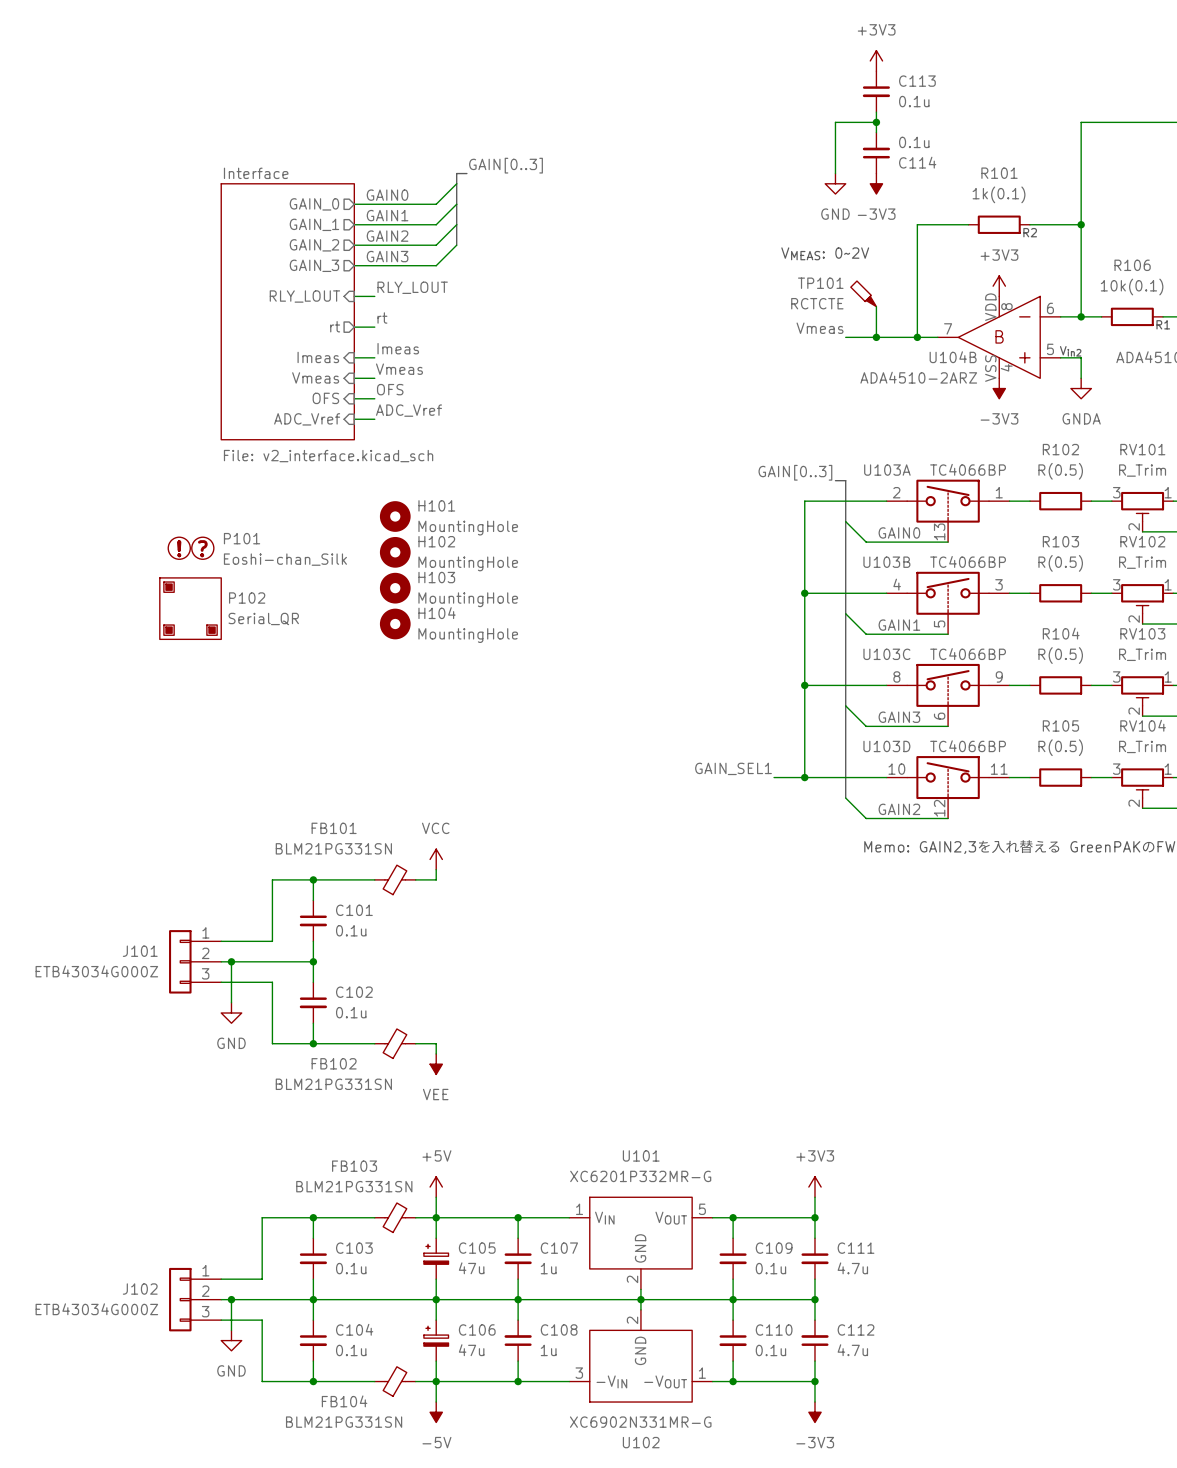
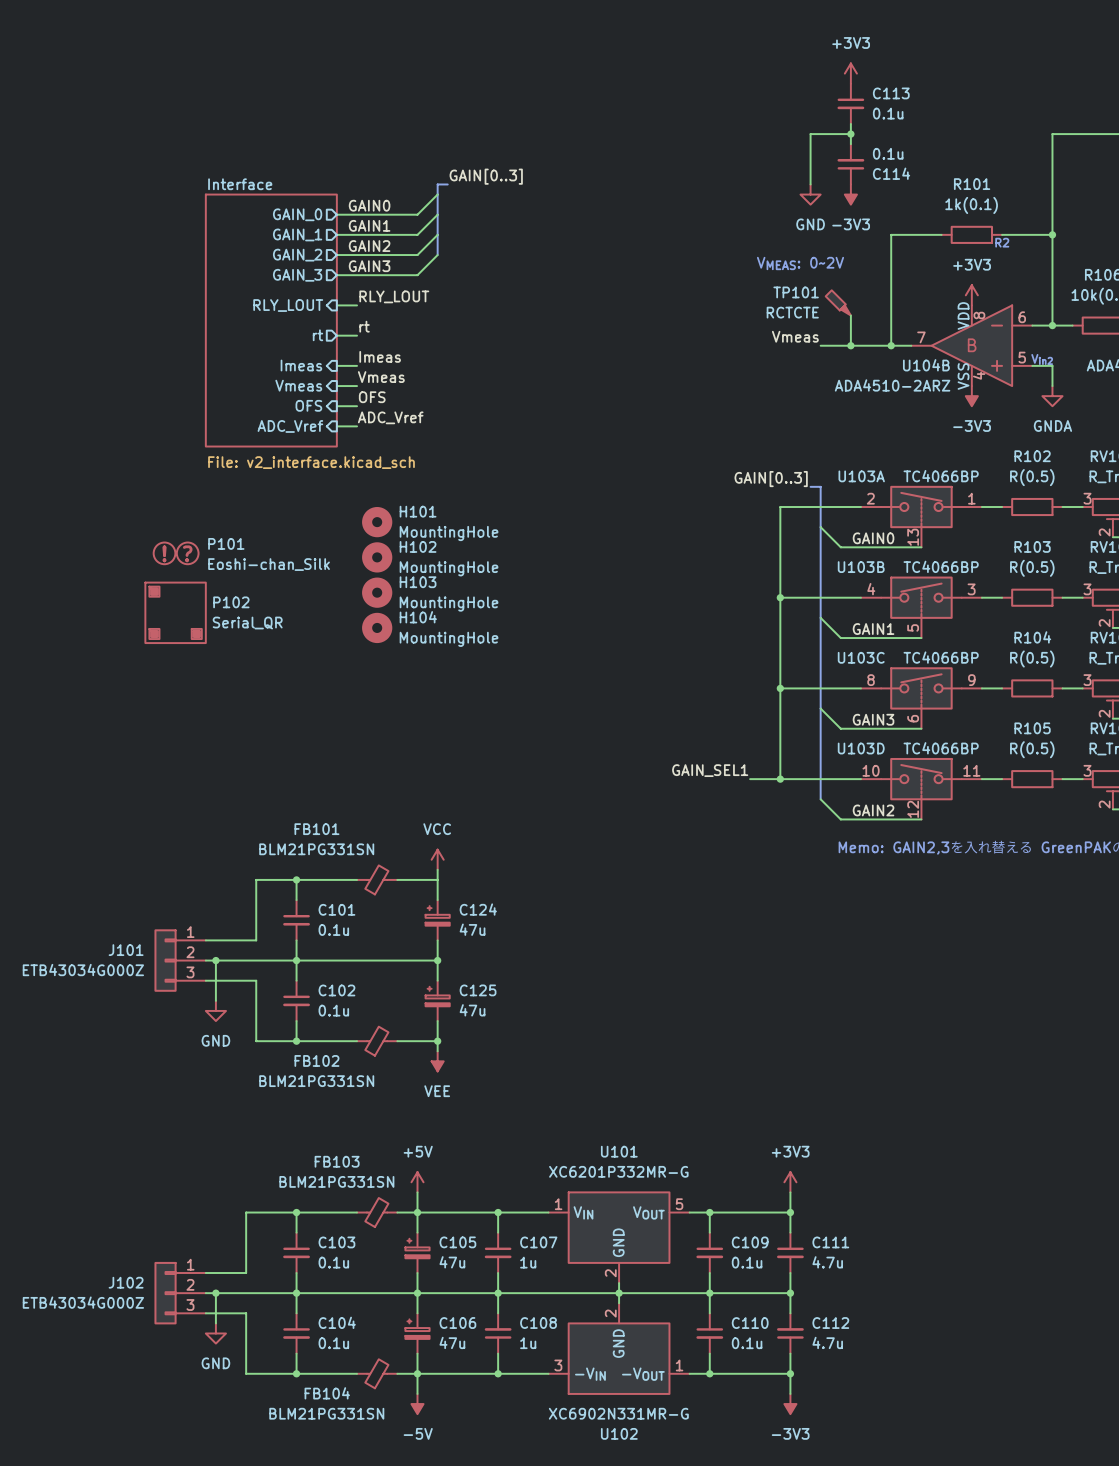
power symbol position: VCC (436, 859) -> VCC (437, 859)
wire: (436, 869) (436, 879) -> (437, 879) (417, 879)
wire: none -> (437, 869) (437, 900)
C124: none -> 47u (437, 920)
wire: none -> (437, 940) (437, 980)
wire: none -> (296, 960) (437, 960)
junction: none -> (437, 960)
C125: none -> 47u (437, 1000)
wire: none -> (437, 1021) (437, 1051)
wire: (436, 1043) (436, 1053) -> (417, 1041) (437, 1041)
junction: none -> (437, 1041)
power symbol position: VEE (436, 1064) -> VEE (437, 1061)

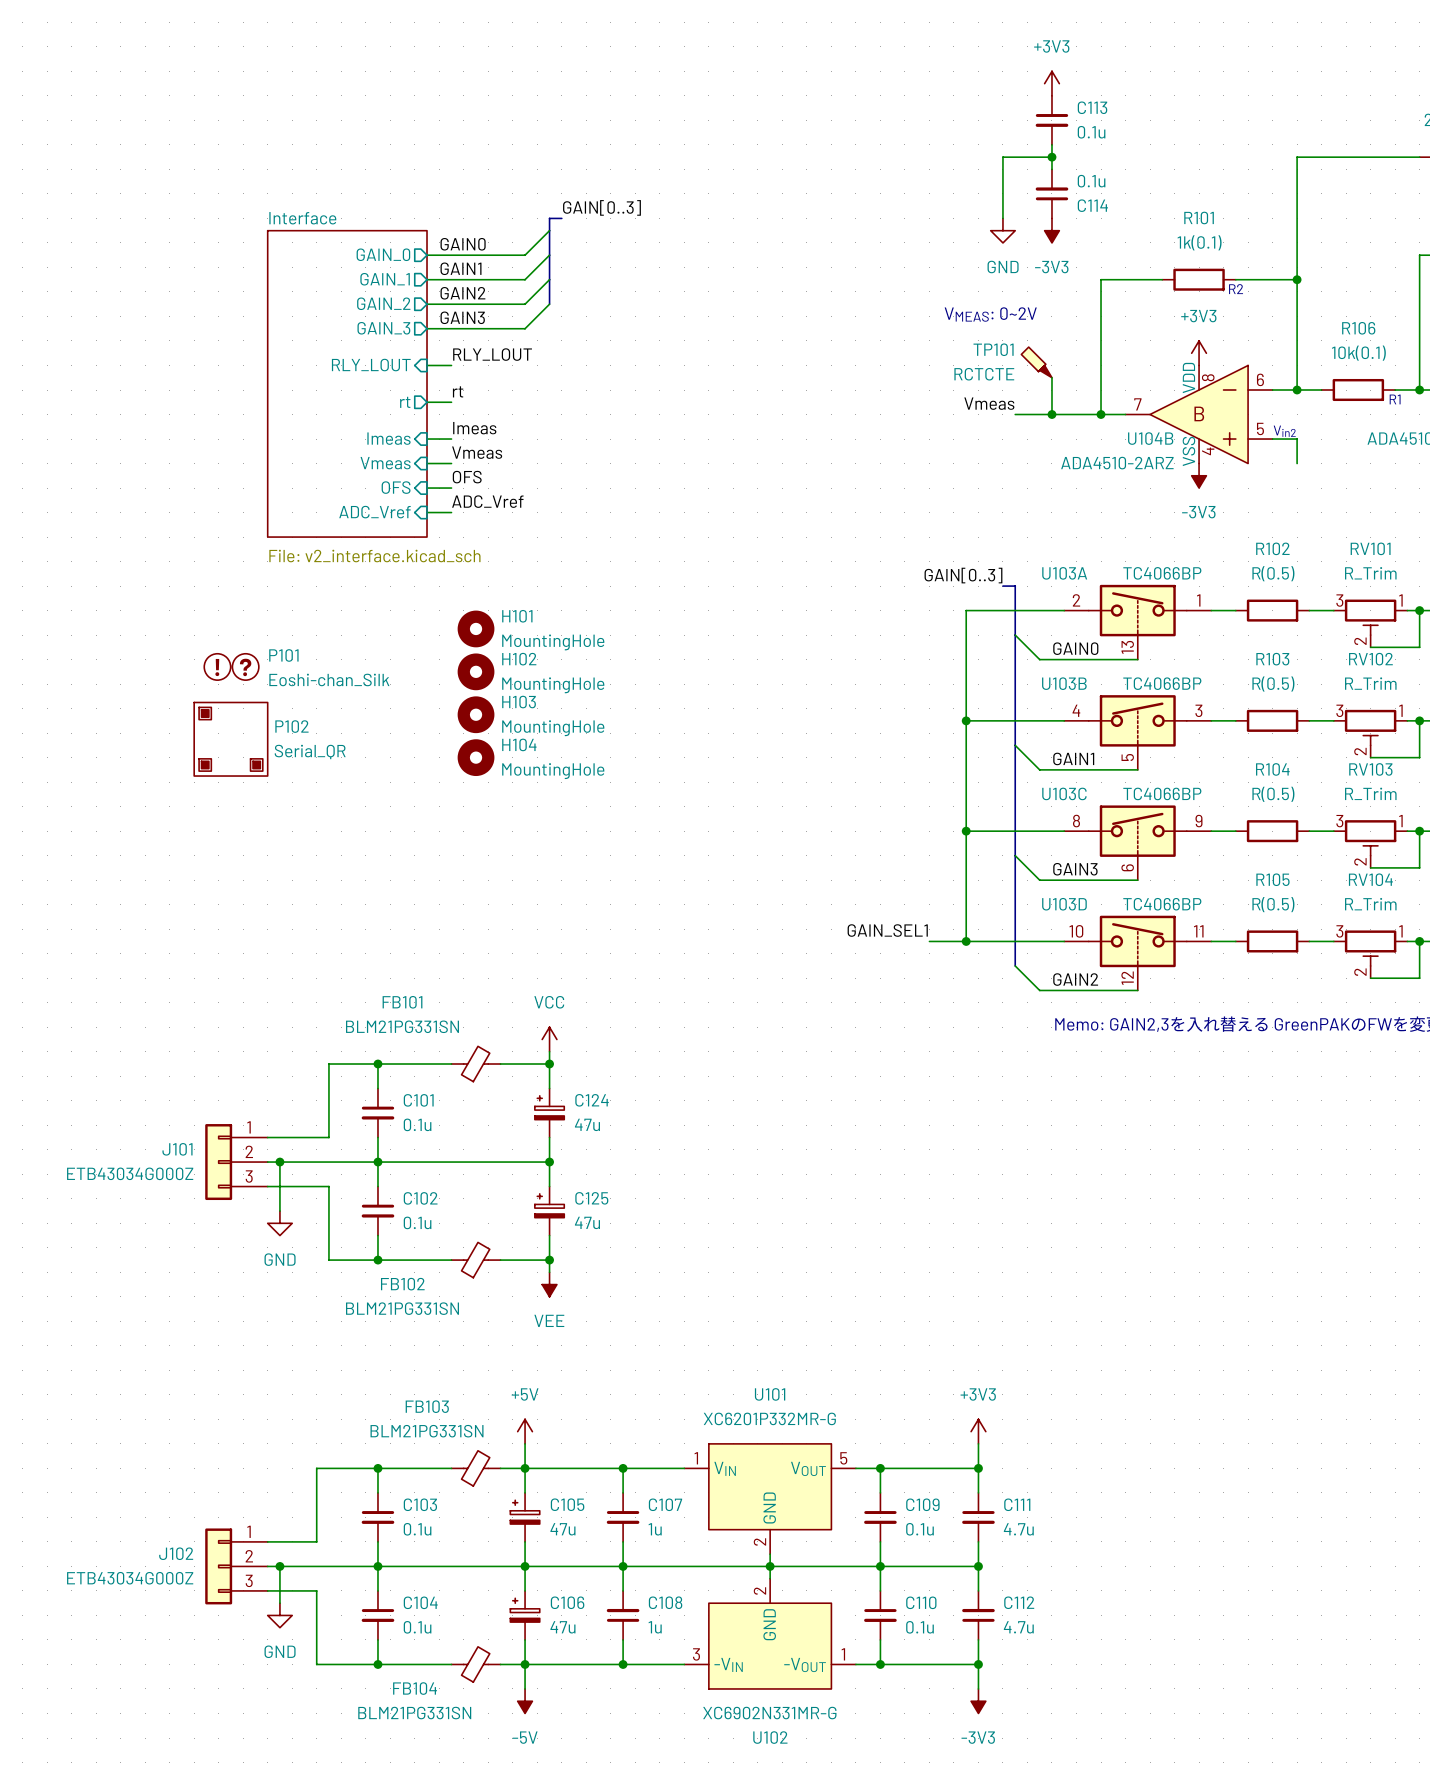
power symbol: GNDA (1052, 396) -> none
junction: none -> (549, 1064)

